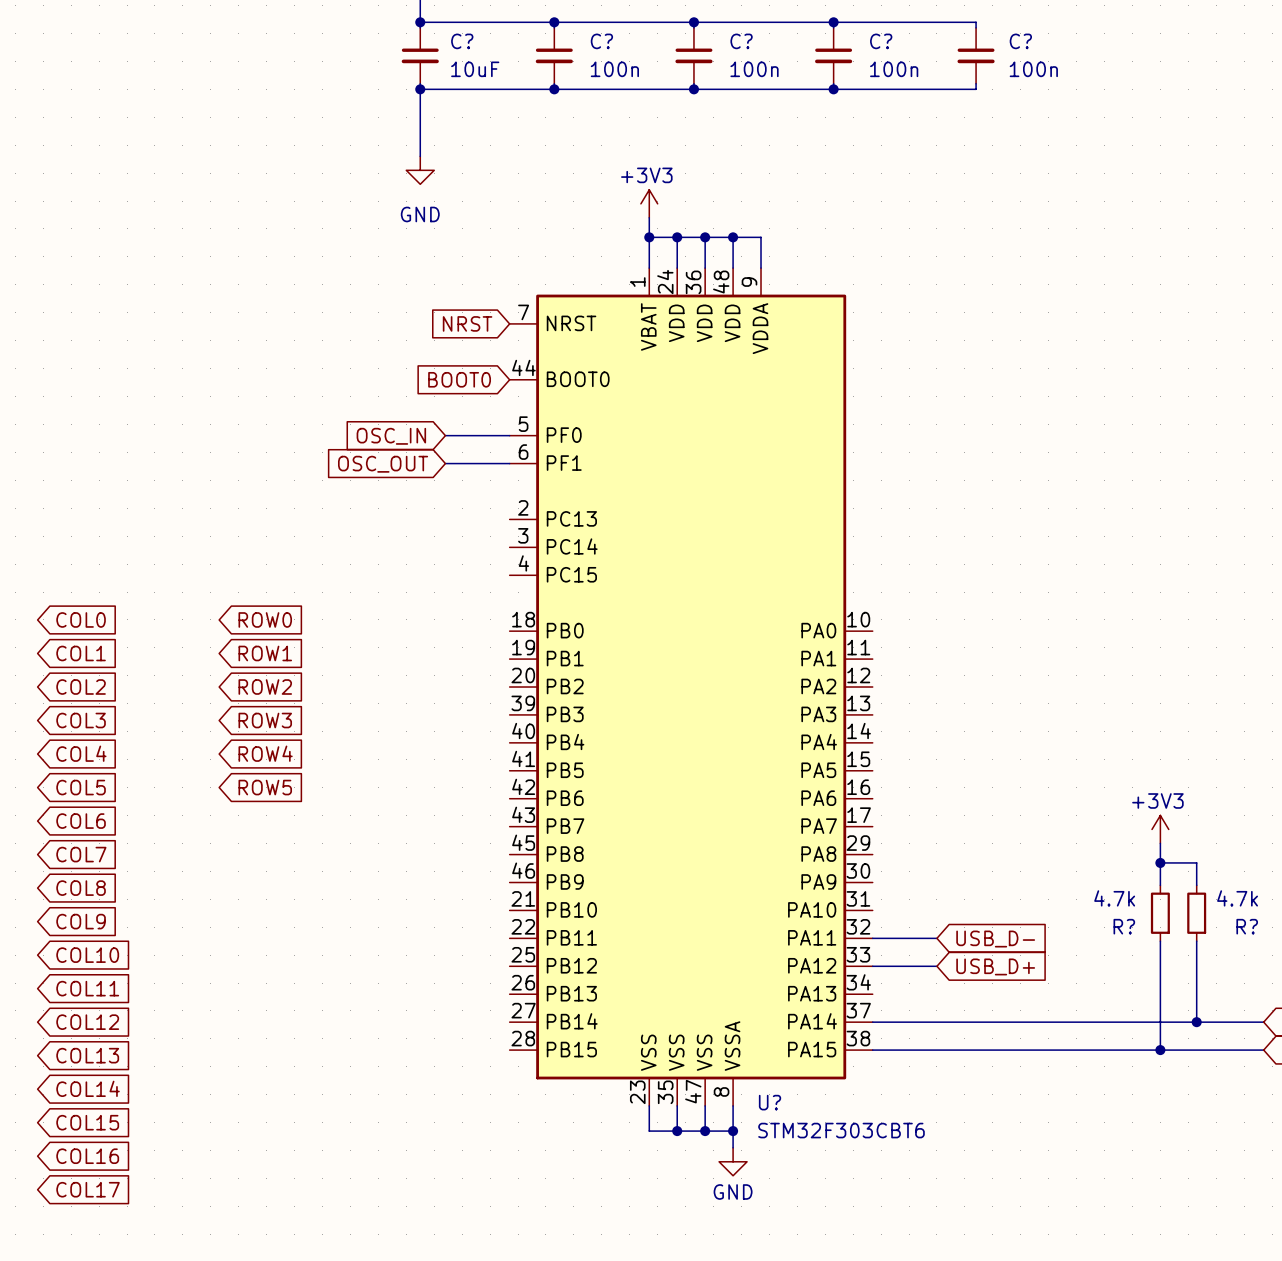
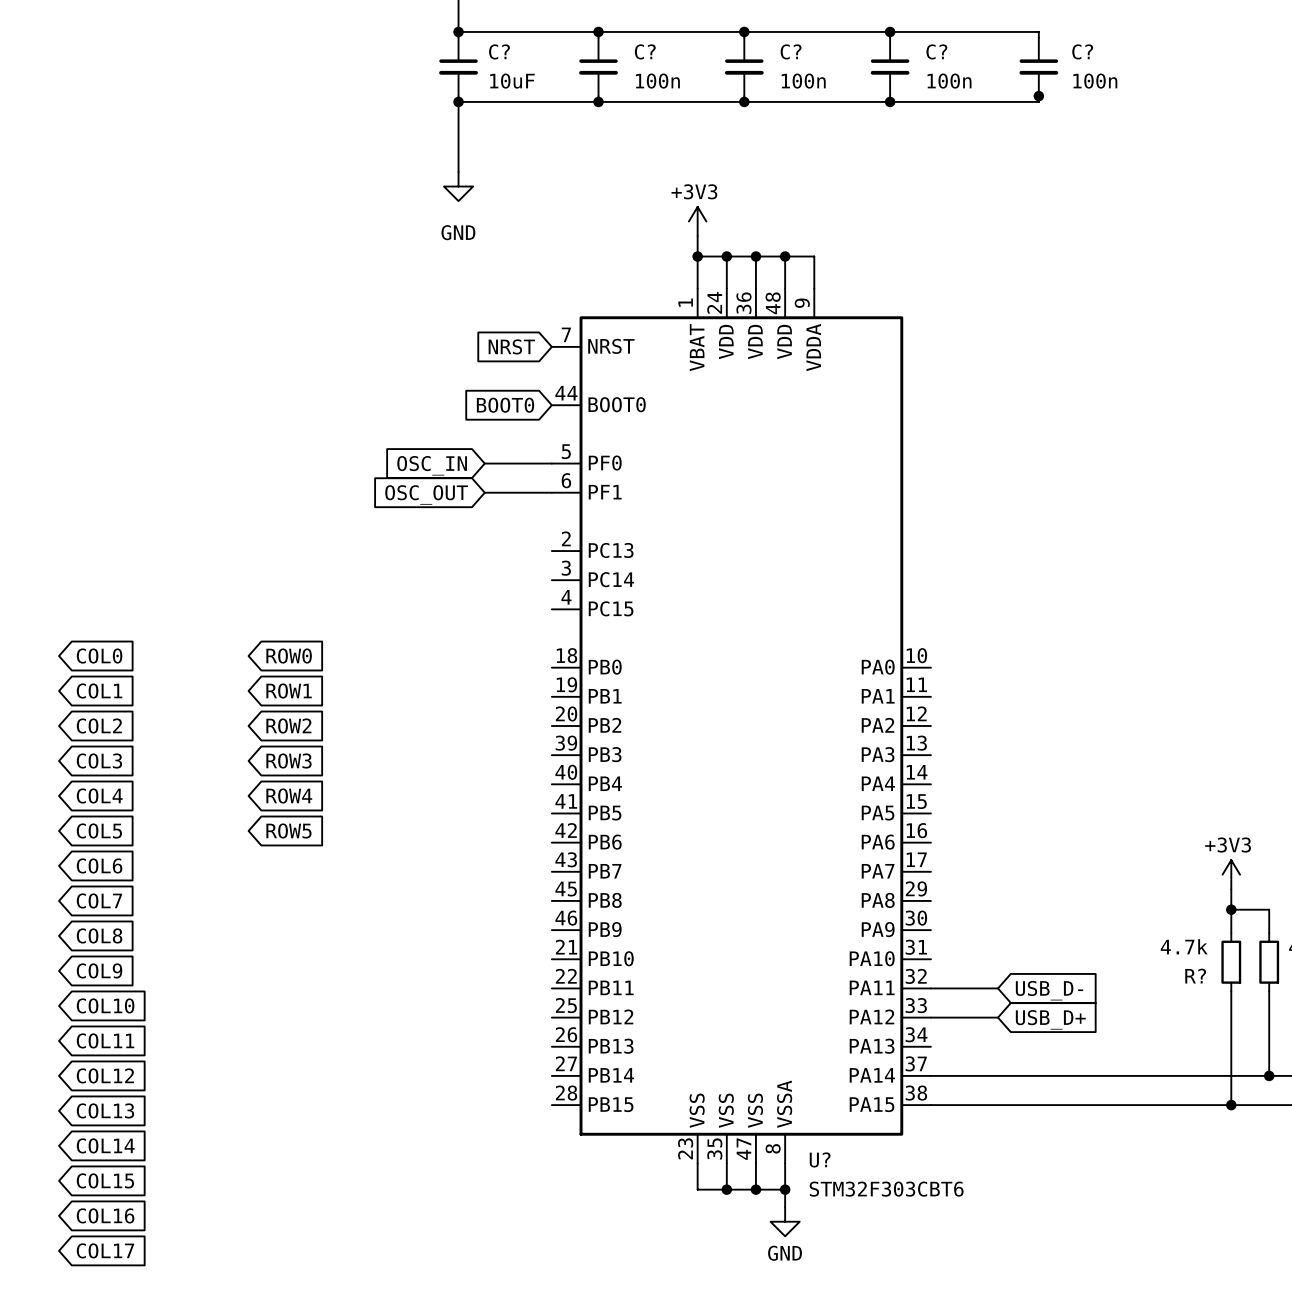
junction: none -> (1038, 96)

